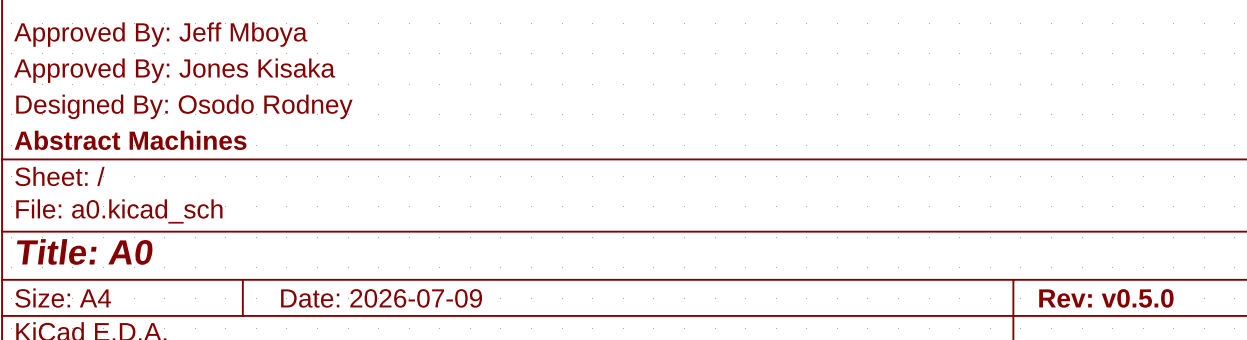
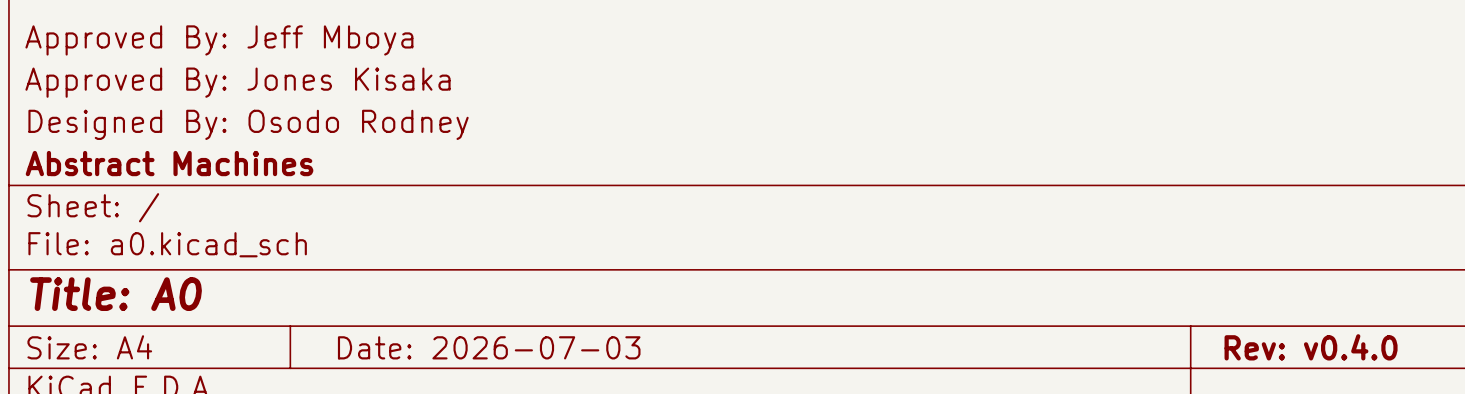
title block: Date: 2026-07-09 (381, 298) -> Date: 2026-07-03 (489, 347)
title block: Rev: v0.5.0 (1106, 298) -> Rev: v0.4.0 (1311, 347)

